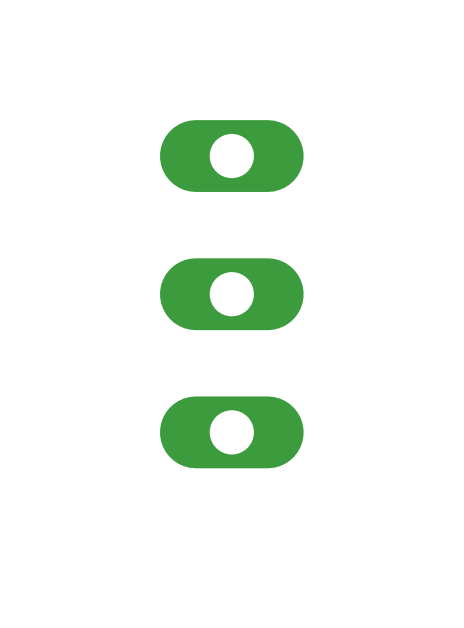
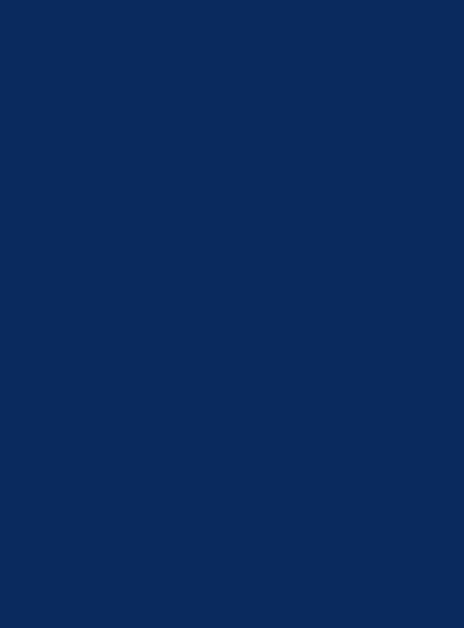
part: (231, 294) -> none

